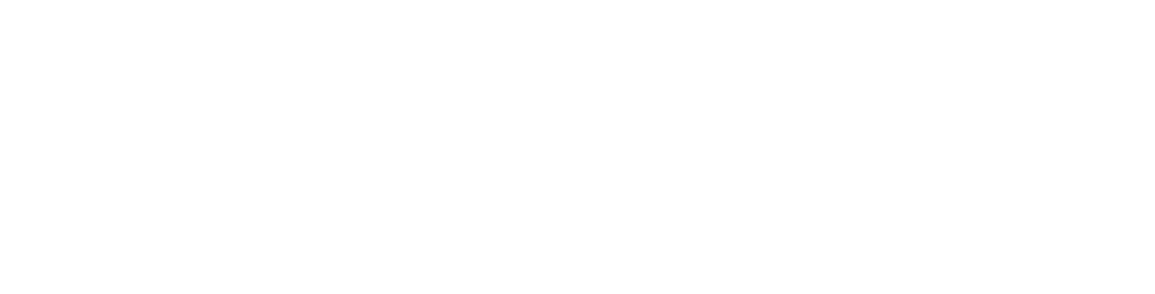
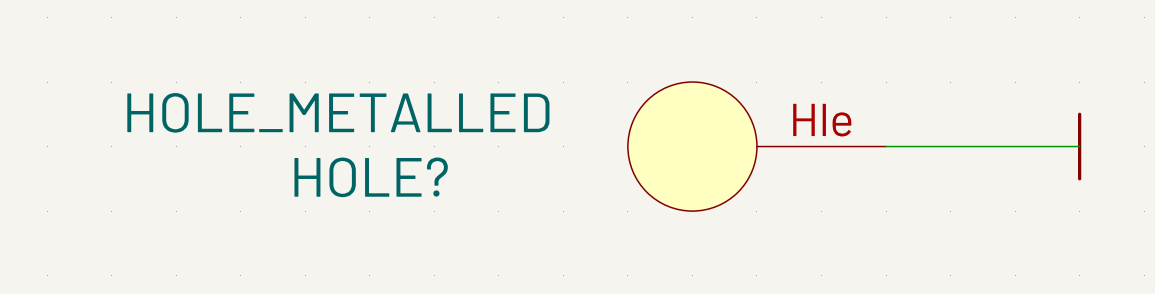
HOLE?: none -> HOLE_METALLED (756, 146)
wire: none -> (886, 146) (1079, 146)
power symbol: none -> (1079, 146)

